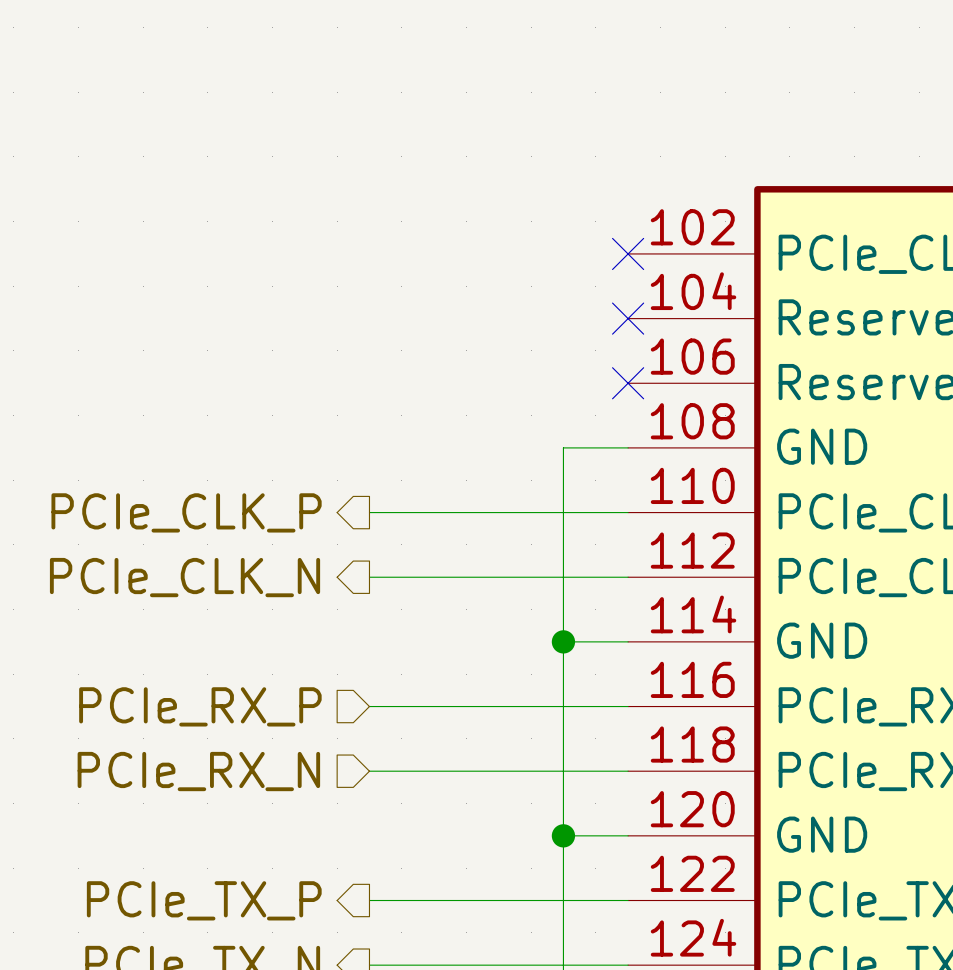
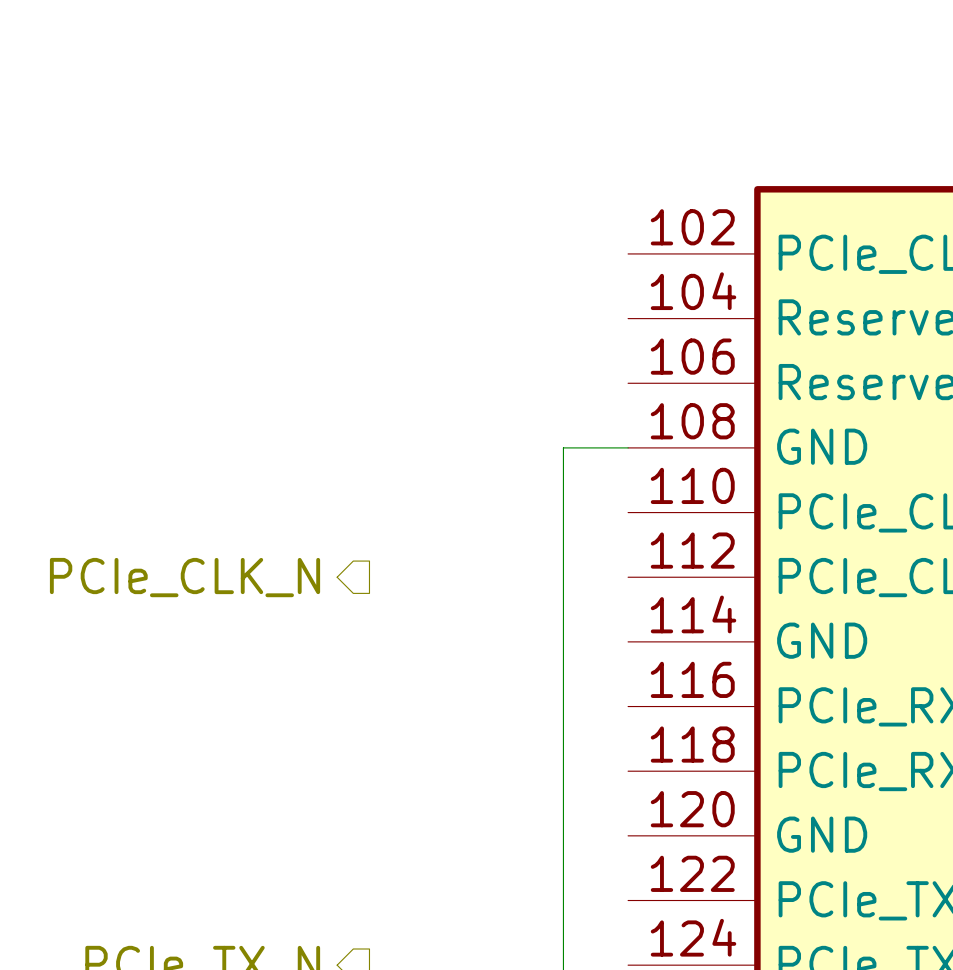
no-connect mark: (628, 253) -> none
no-connect mark: (628, 318) -> none
no-connect mark: (628, 383) -> none
hierarchical label: PCIe_CLK_P (186, 512) -> none
wire: (369, 512) (628, 512) -> none
wire: (369, 577) (628, 577) -> none
wire: (563, 641) (628, 641) -> none
junction: (563, 641) -> none
hierarchical label: PCIe_RX_P (200, 706) -> none
wire: (369, 706) (628, 706) -> none
hierarchical label: PCIe_RX_N (198, 771) -> none
wire: (369, 771) (628, 771) -> none
wire: (563, 835) (628, 835) -> none
junction: (563, 835) -> none
hierarchical label: PCIe_TX_P (204, 900) -> none
wire: (369, 900) (628, 900) -> none
wire: (369, 965) (628, 965) -> none

